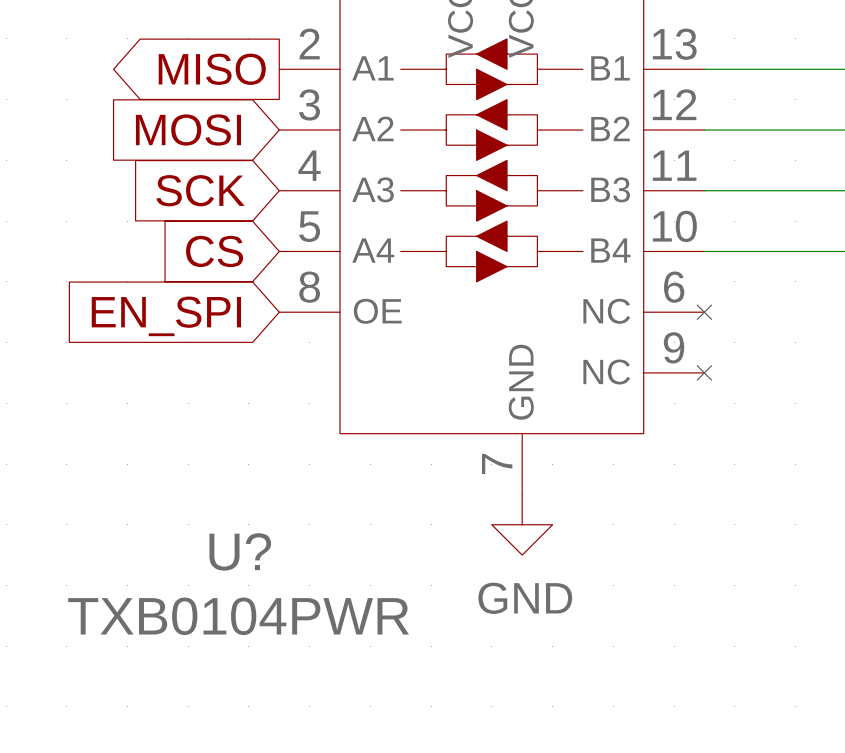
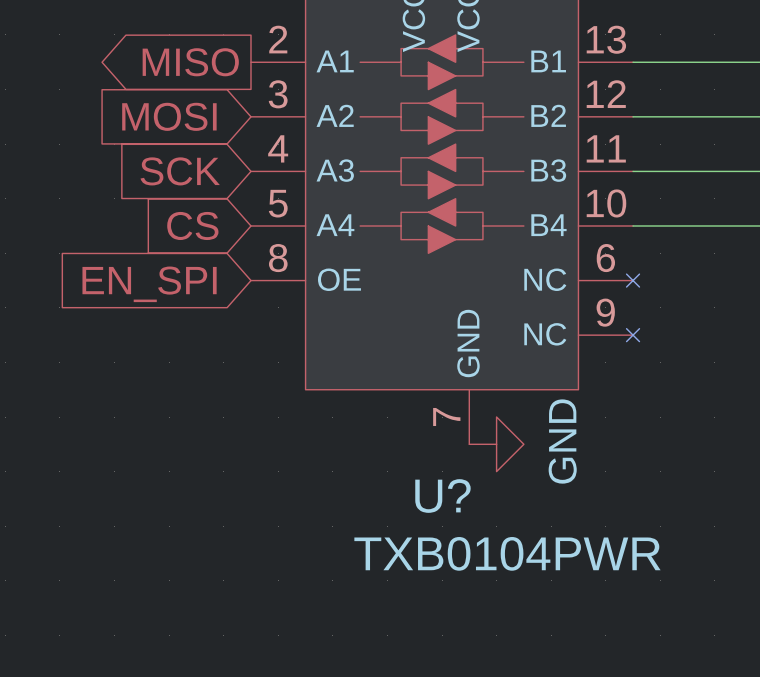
power symbol rotation: 0° (522, 524) -> 90° counterclockwise (496, 444)
power symbol position: GND (522, 524) -> GND (496, 444)
U? name position: U? (240, 551) -> U? (442, 496)
U? value position: TXB0104PWR (238, 616) -> TXB0104PWR (507, 553)

